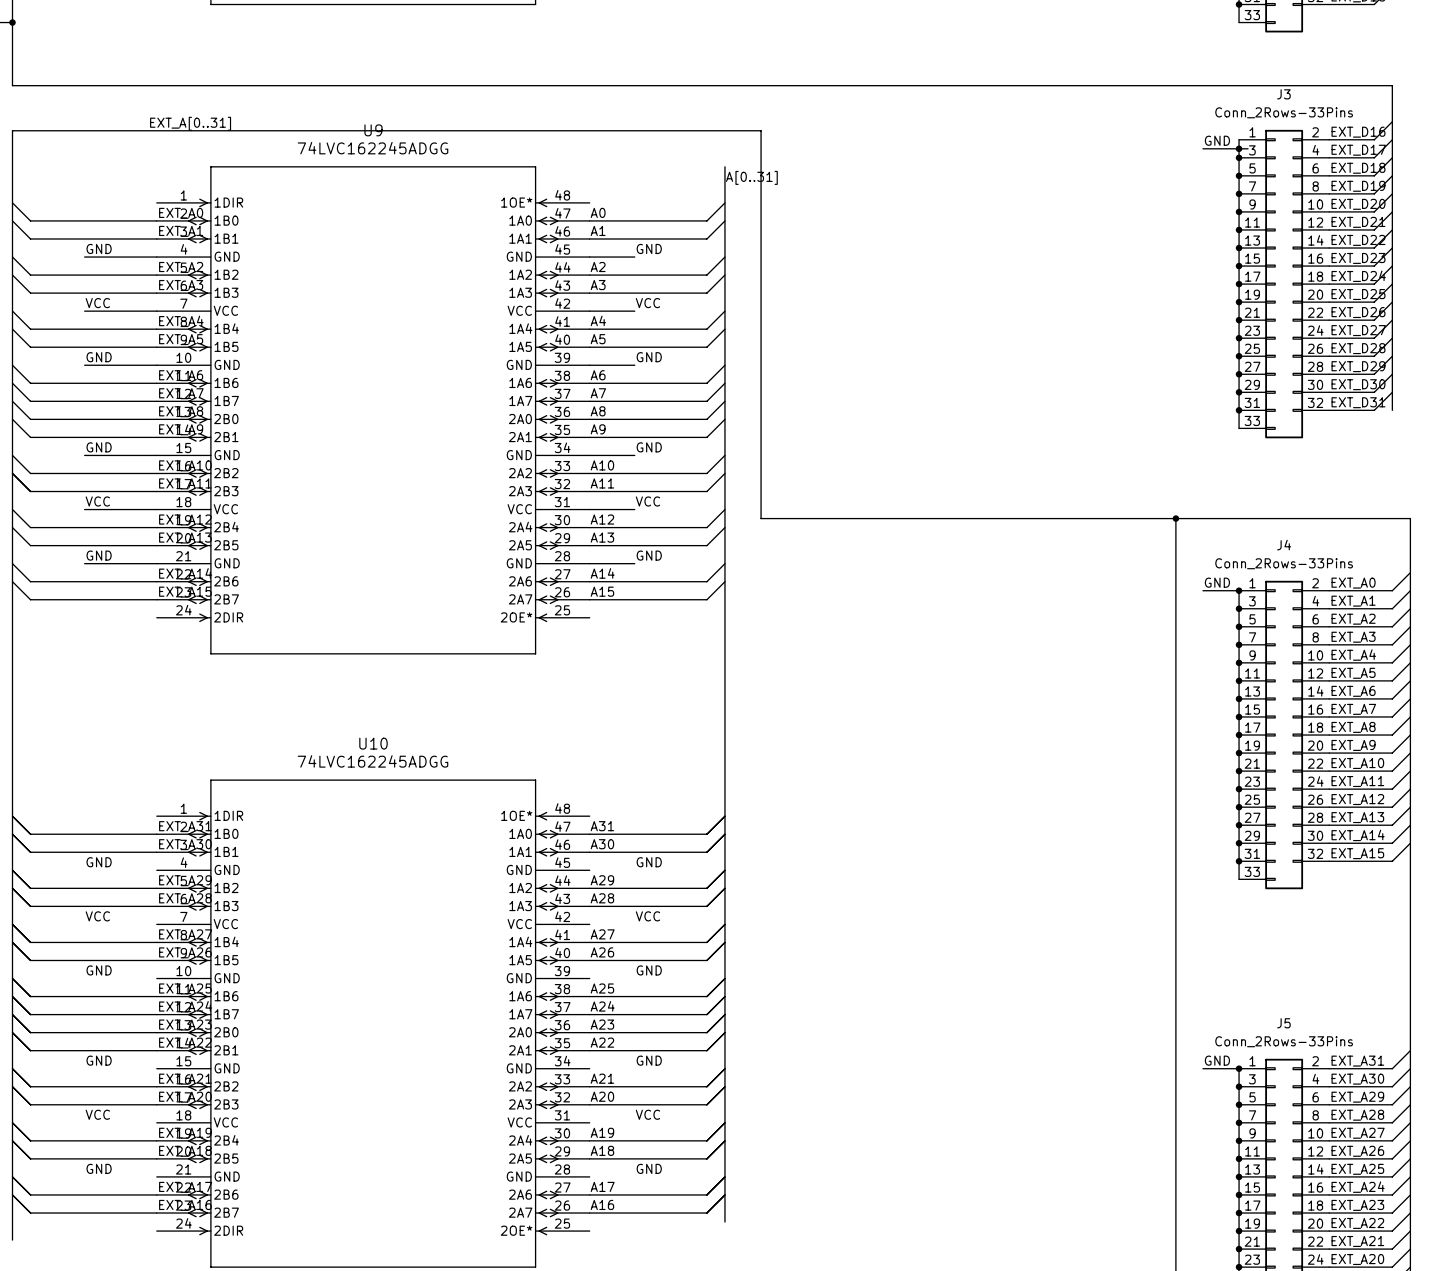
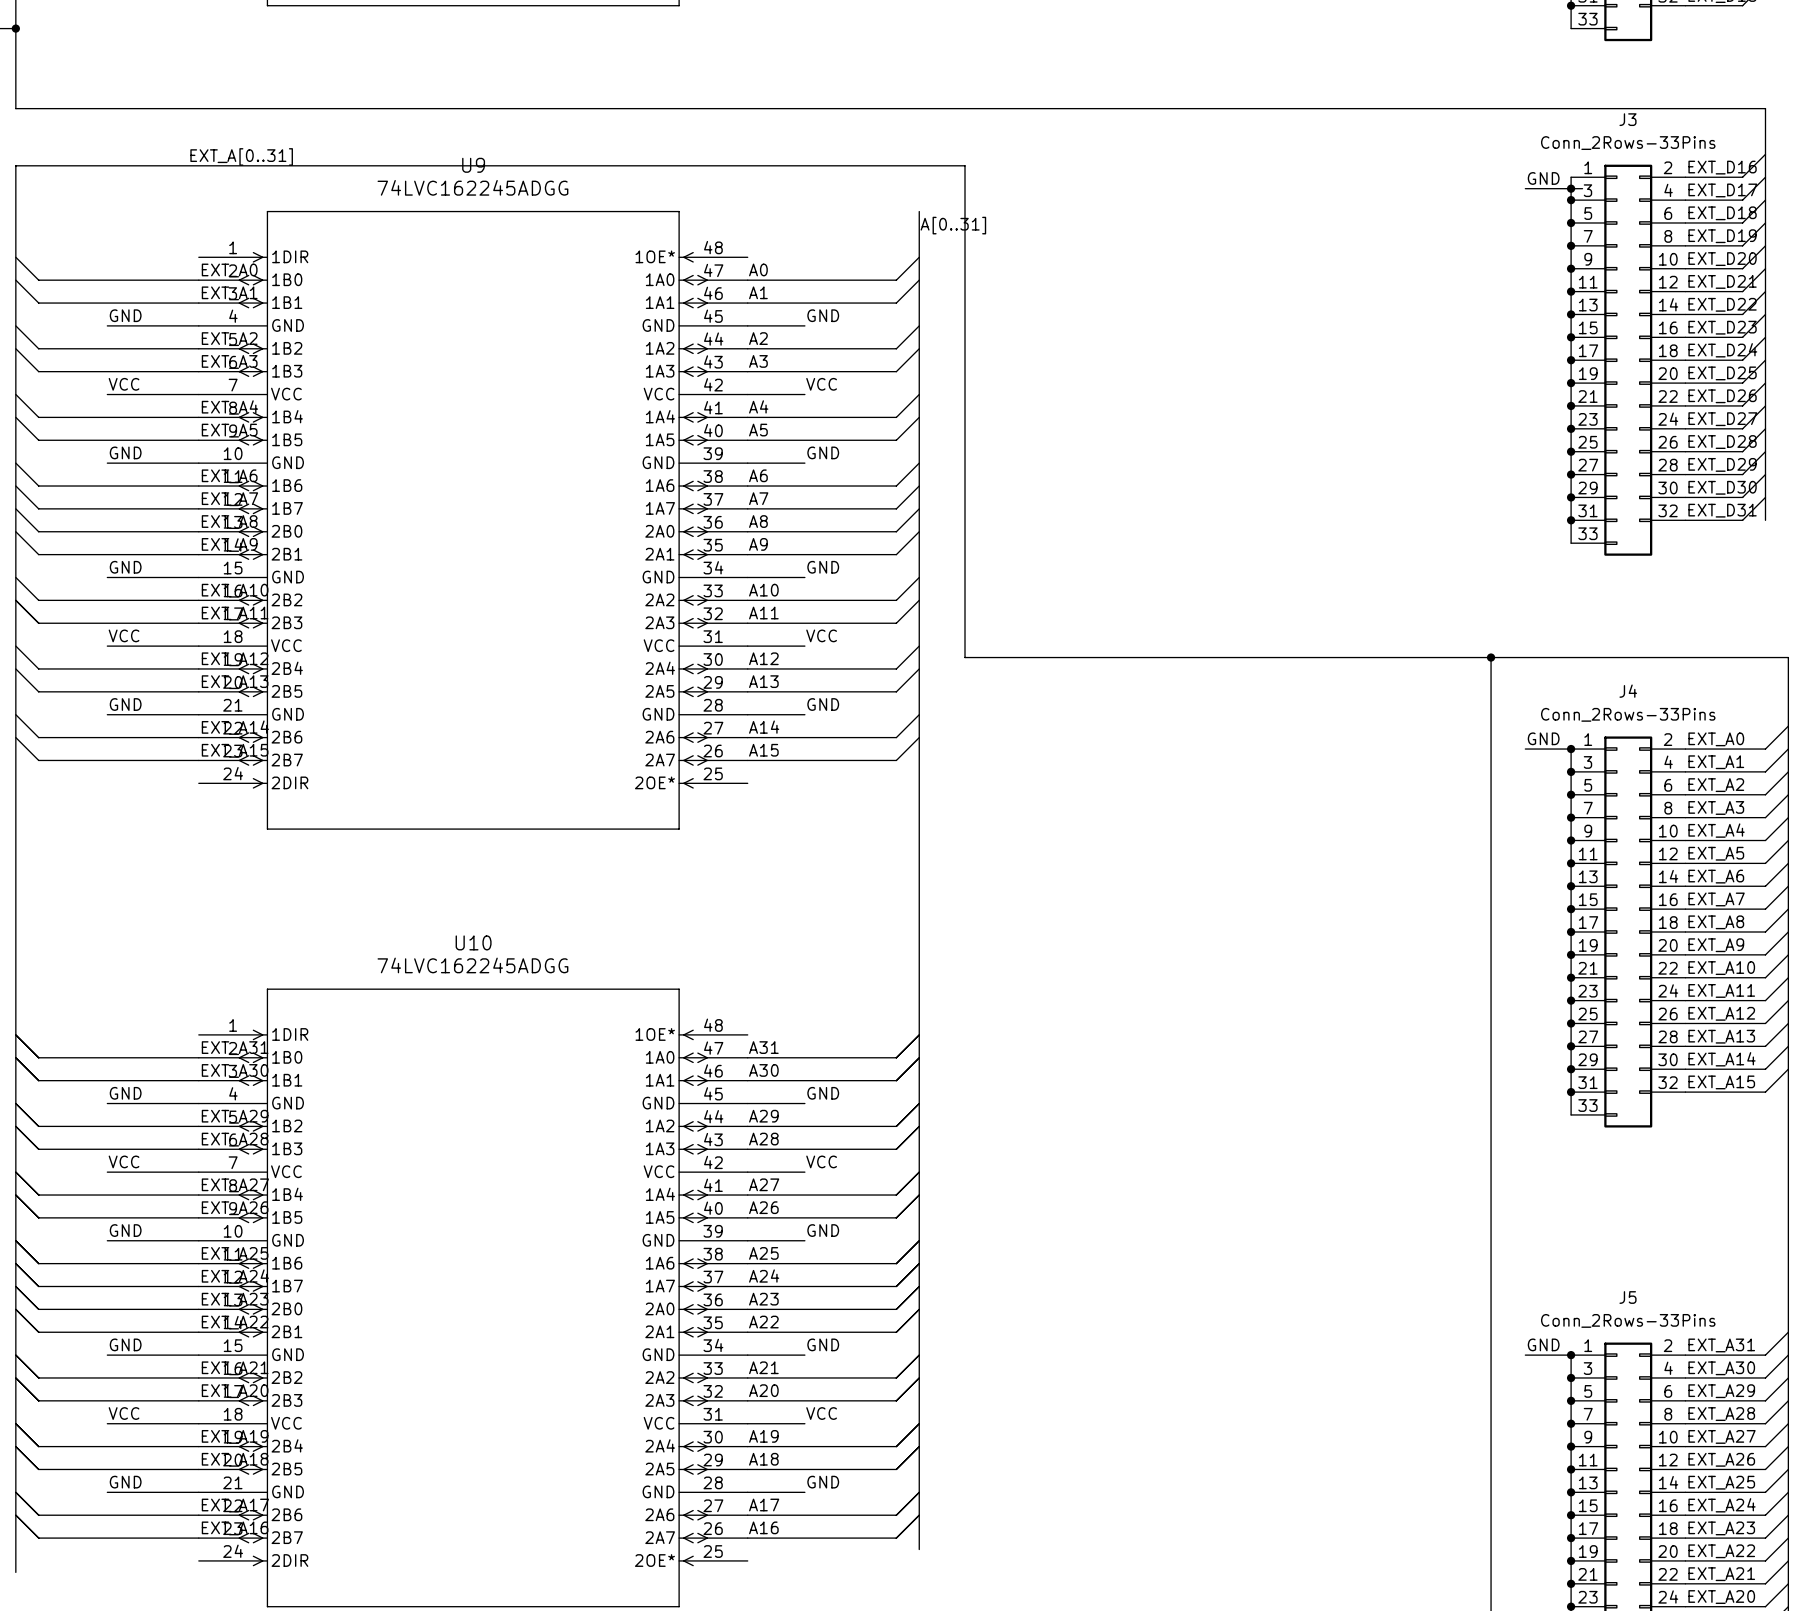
wire: none -> (107, 1103) (198, 1103)
wire: none -> (747, 1103) (804, 1103)
wire: none -> (107, 1172) (198, 1172)
wire: none -> (747, 1172) (804, 1172)
wire: none -> (107, 1240) (198, 1240)
wire: none -> (747, 1240) (804, 1240)
wire: none -> (107, 1355) (198, 1355)
wire: none -> (747, 1355) (804, 1355)
wire: none -> (107, 1423) (198, 1423)
wire: none -> (747, 1423) (804, 1423)
wire: none -> (107, 1492) (198, 1492)
wire: none -> (747, 1492) (804, 1492)

